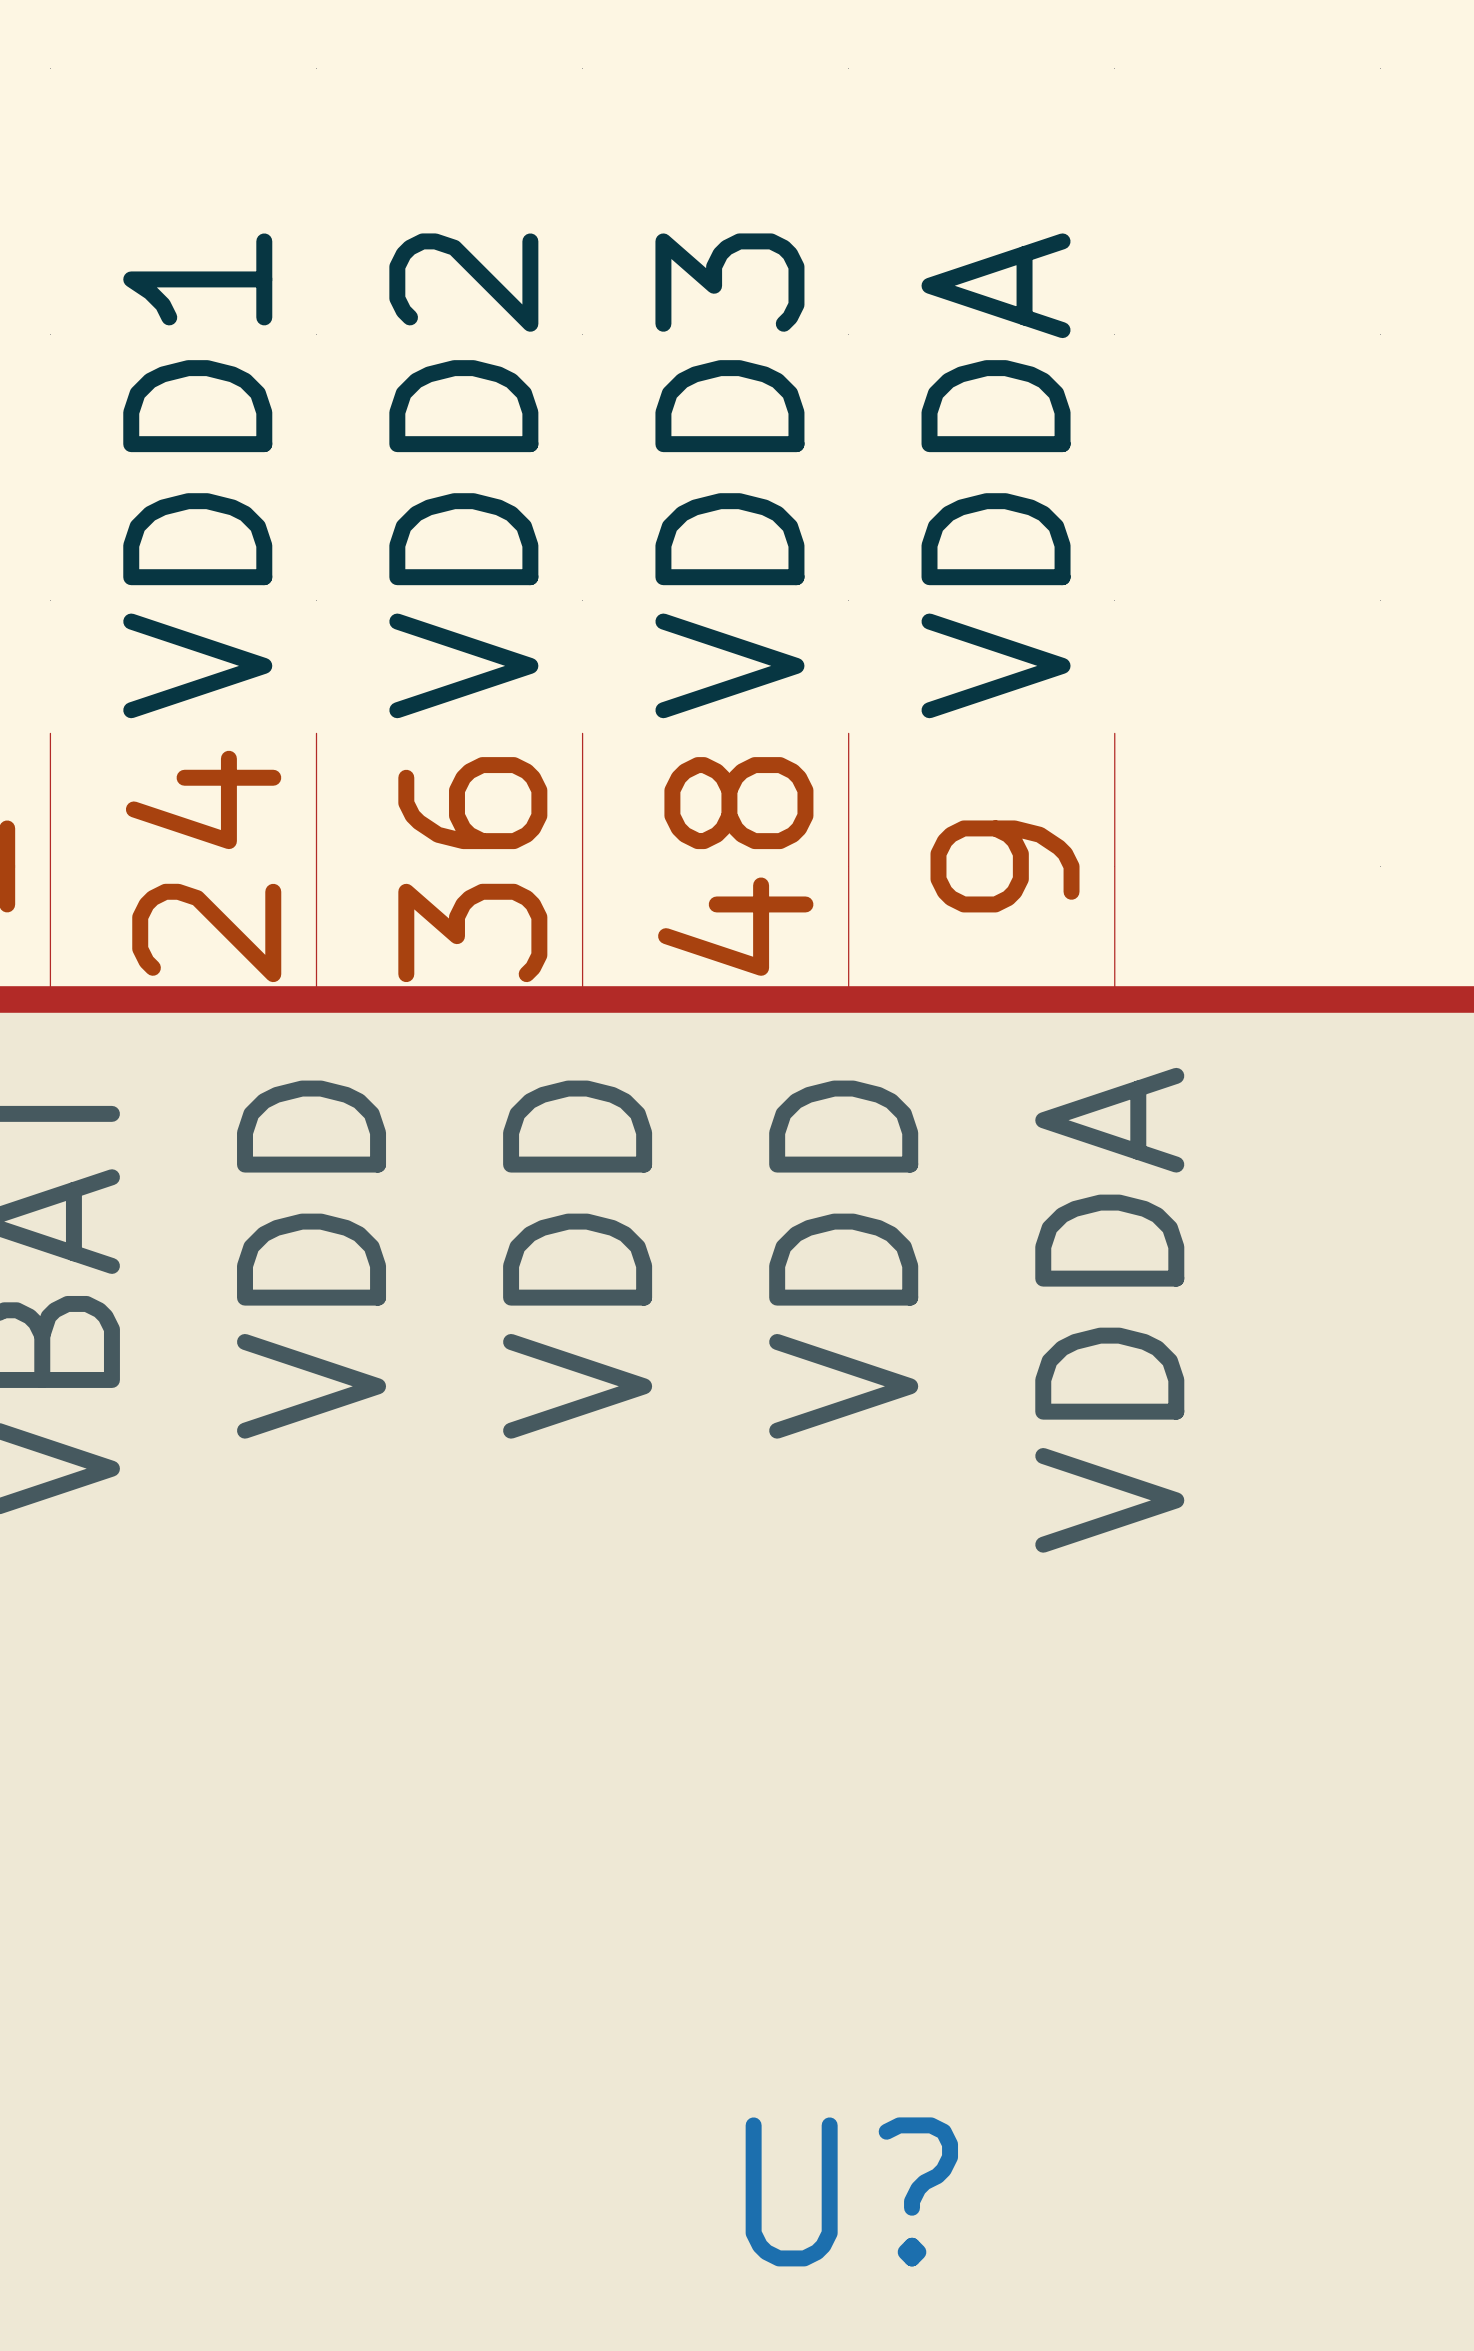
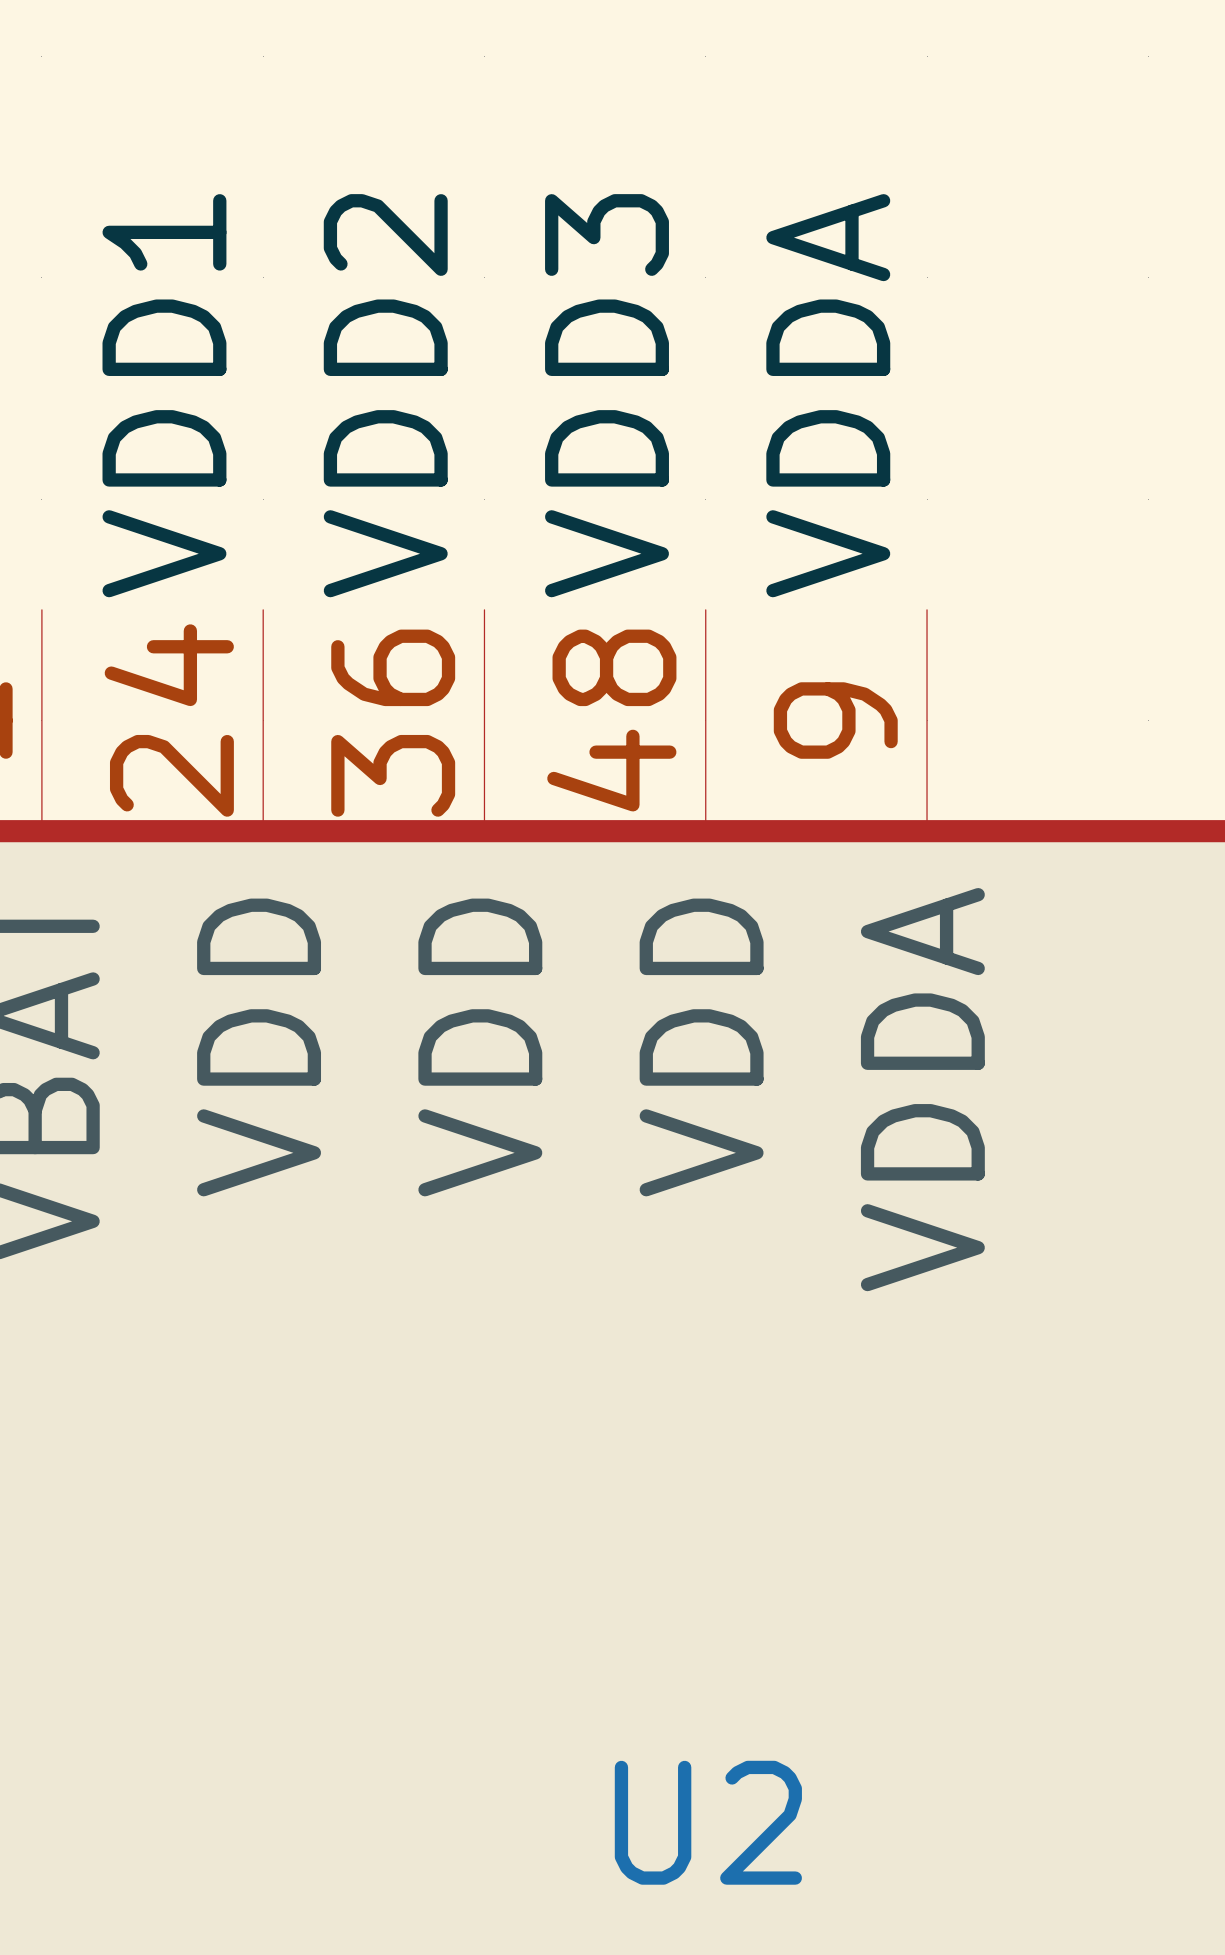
U? name: U? (851, 2191) -> U2 (708, 1822)

